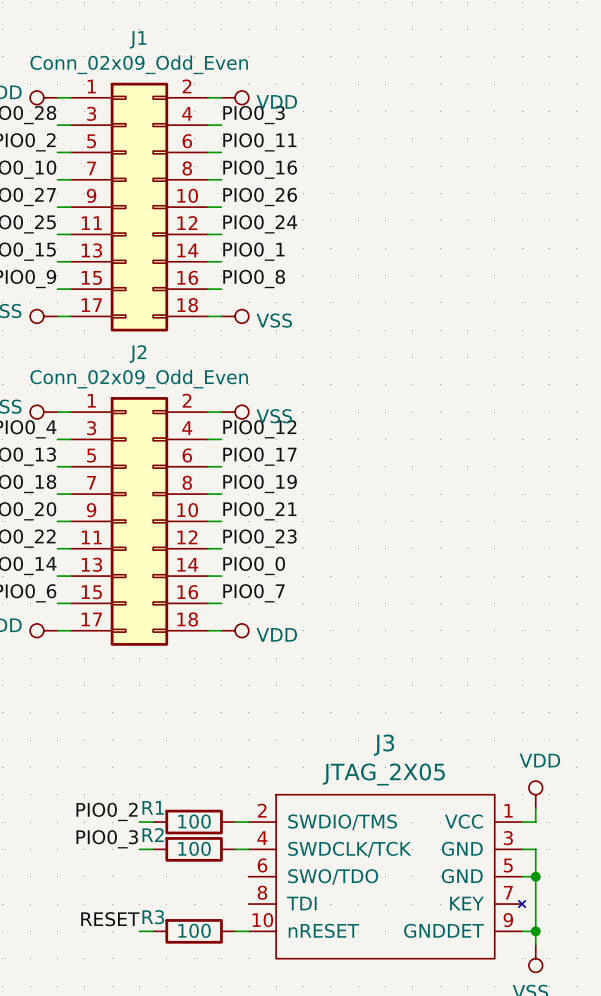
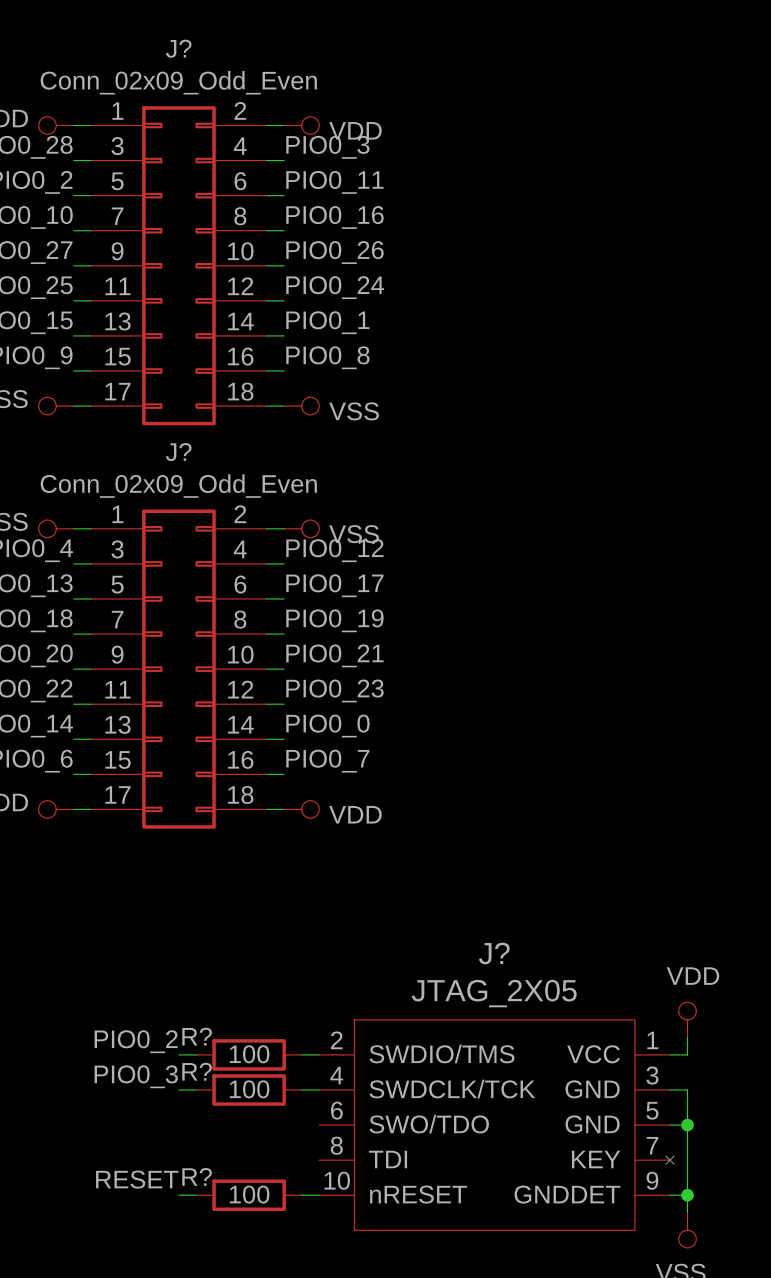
J1 name: J1 (138, 39) -> J? (178, 48)
J2 name: J2 (138, 354) -> J? (178, 452)
J3 name: J3 (383, 745) -> J? (494, 953)
R1 name: R1 (153, 807) -> R? (197, 1036)
R2 name: R2 (153, 835) -> R? (197, 1071)
R3 name: R3 (153, 917) -> R? (197, 1176)

